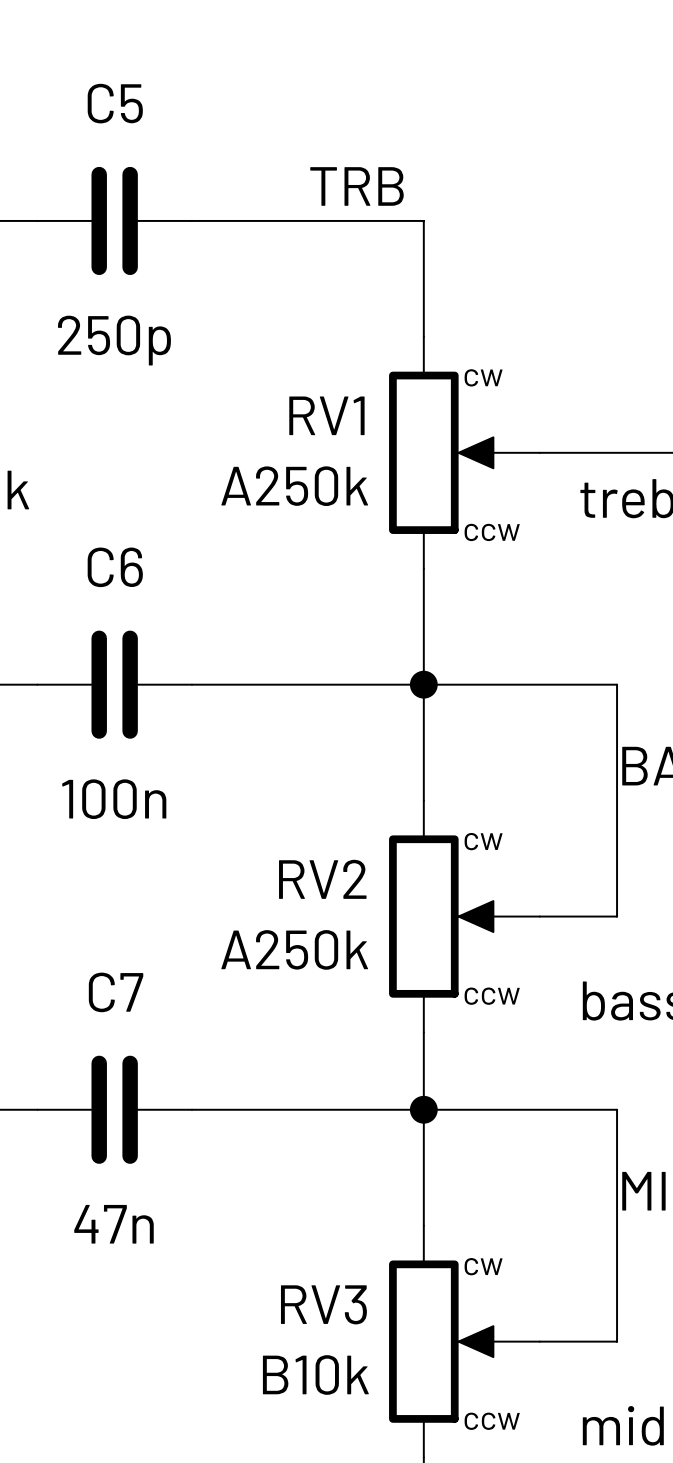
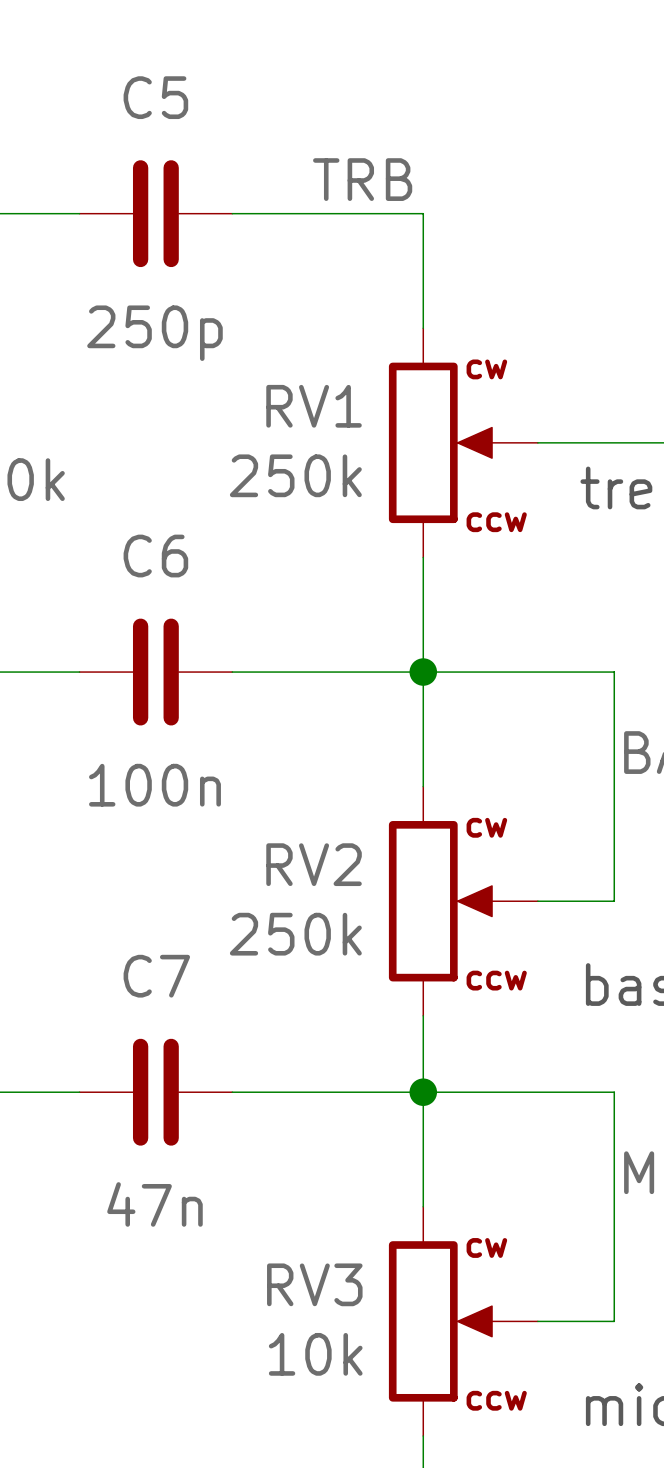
C5 position: (114, 220) -> (155, 213)
RV1 value: A250k (294, 486) -> 250k (295, 475)
C6 position: (114, 684) -> (155, 672)
RV2 value: A250k (294, 949) -> 250k (295, 934)
C7 position: (114, 1109) -> (155, 1092)
RV3 value: B10k (315, 1374) -> 10k (315, 1354)

